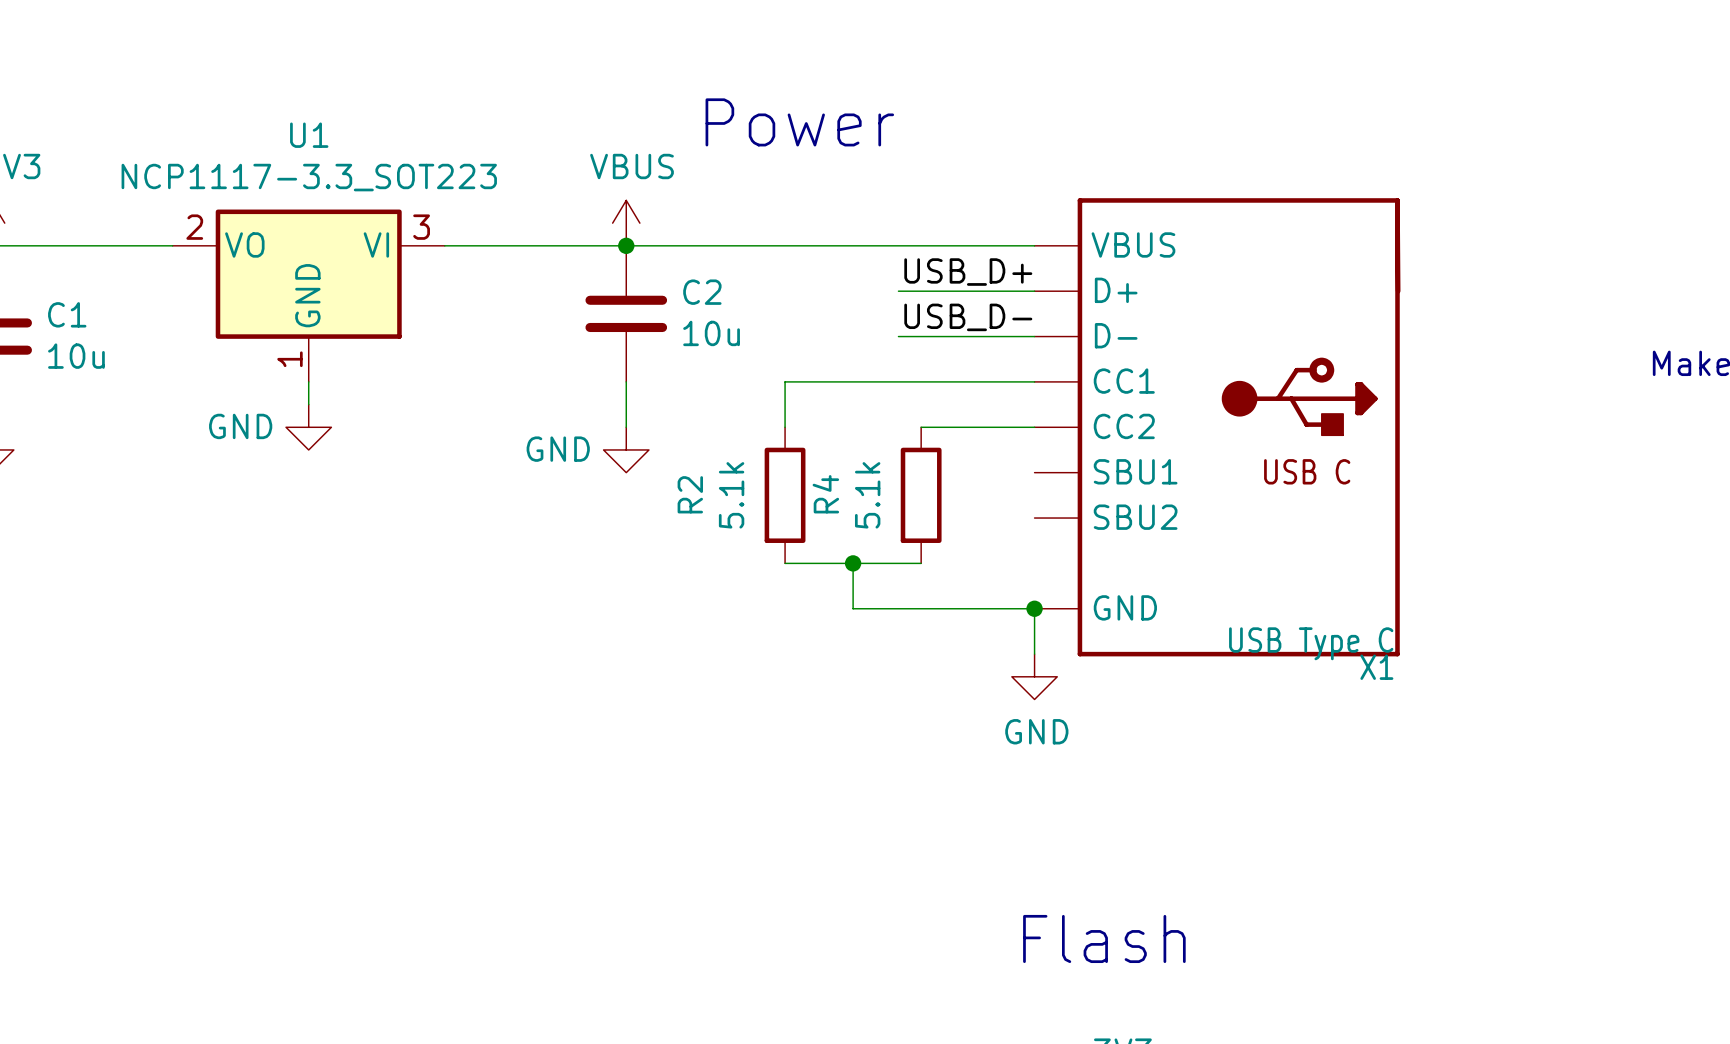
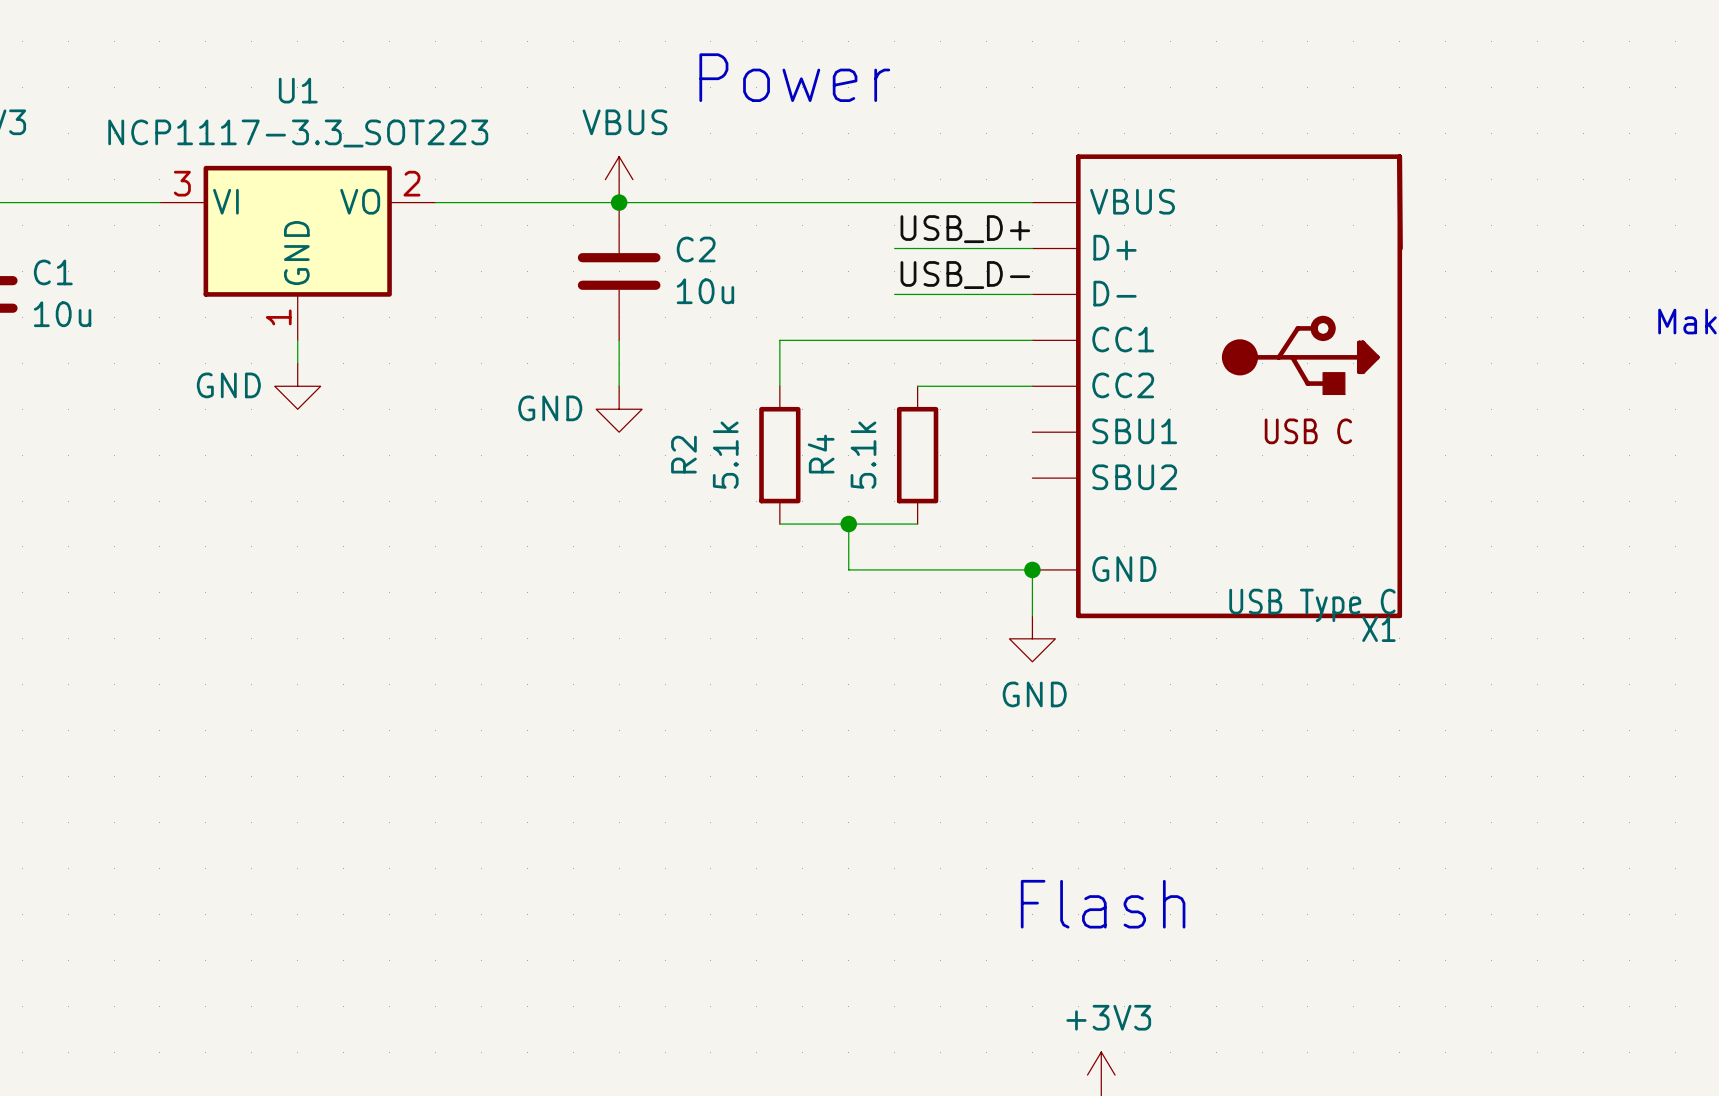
U1 flip: as is (308, 274) -> left-right (297, 231)

